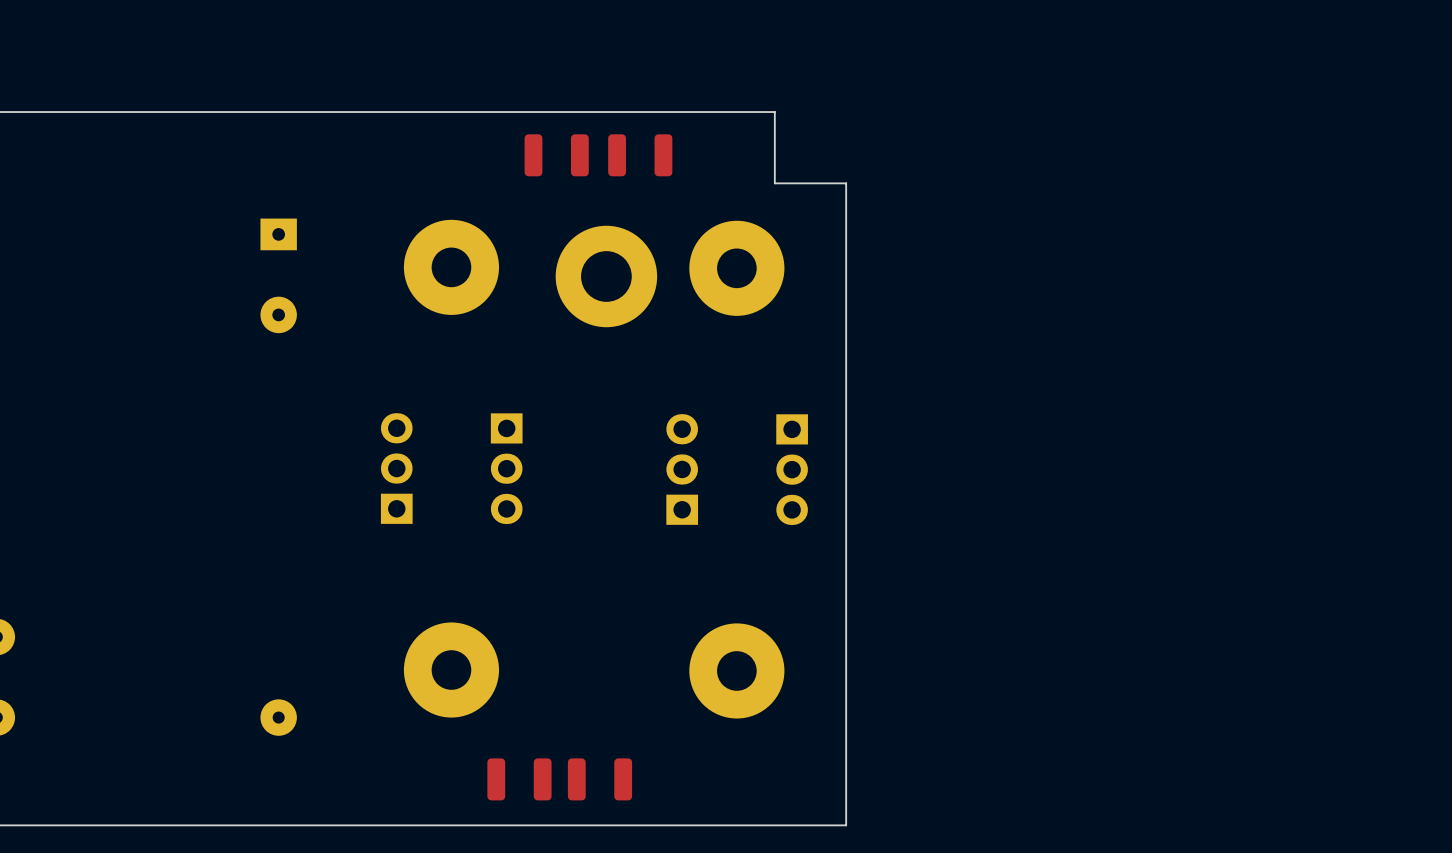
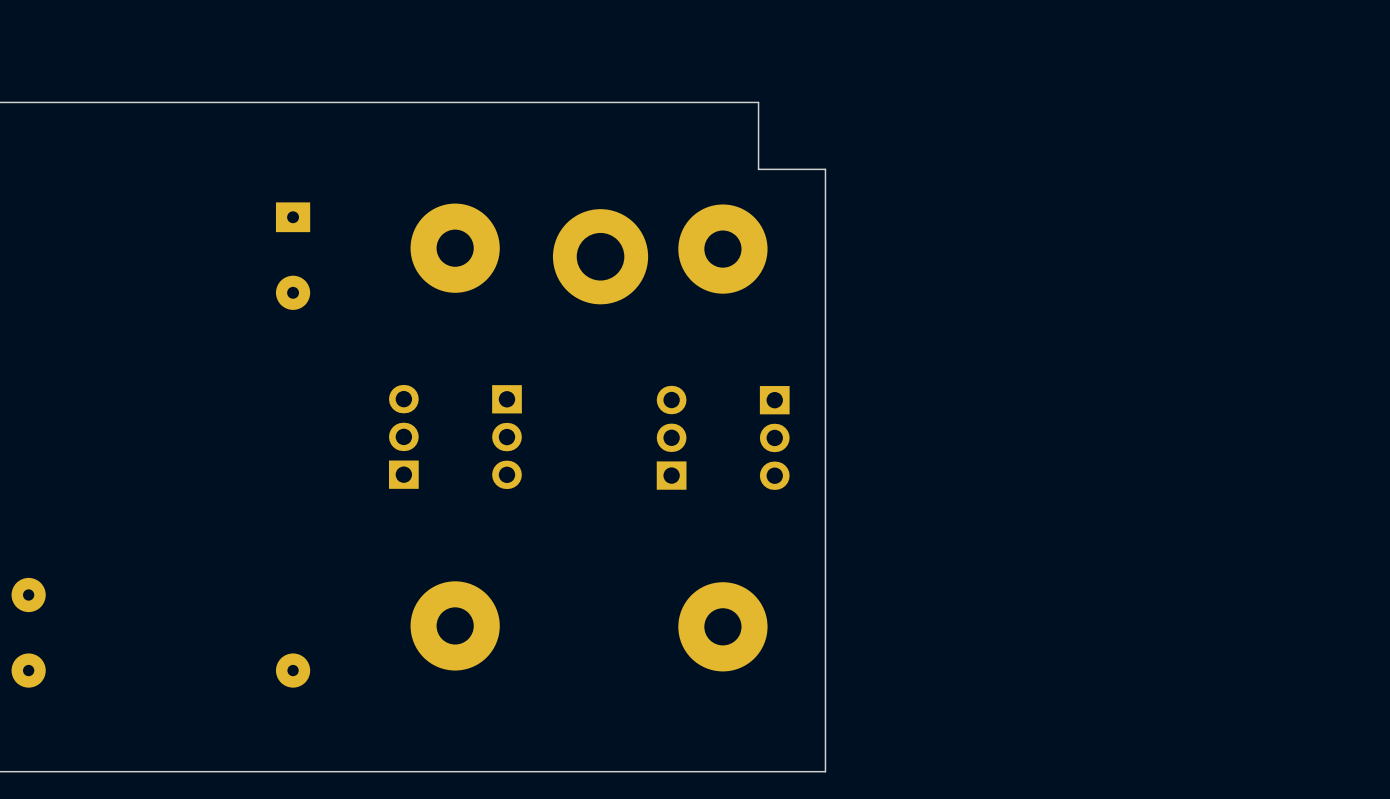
part: (556, 155) -> none
part: (640, 155) -> none
part: (519, 779) -> none
part: (599, 779) -> none

